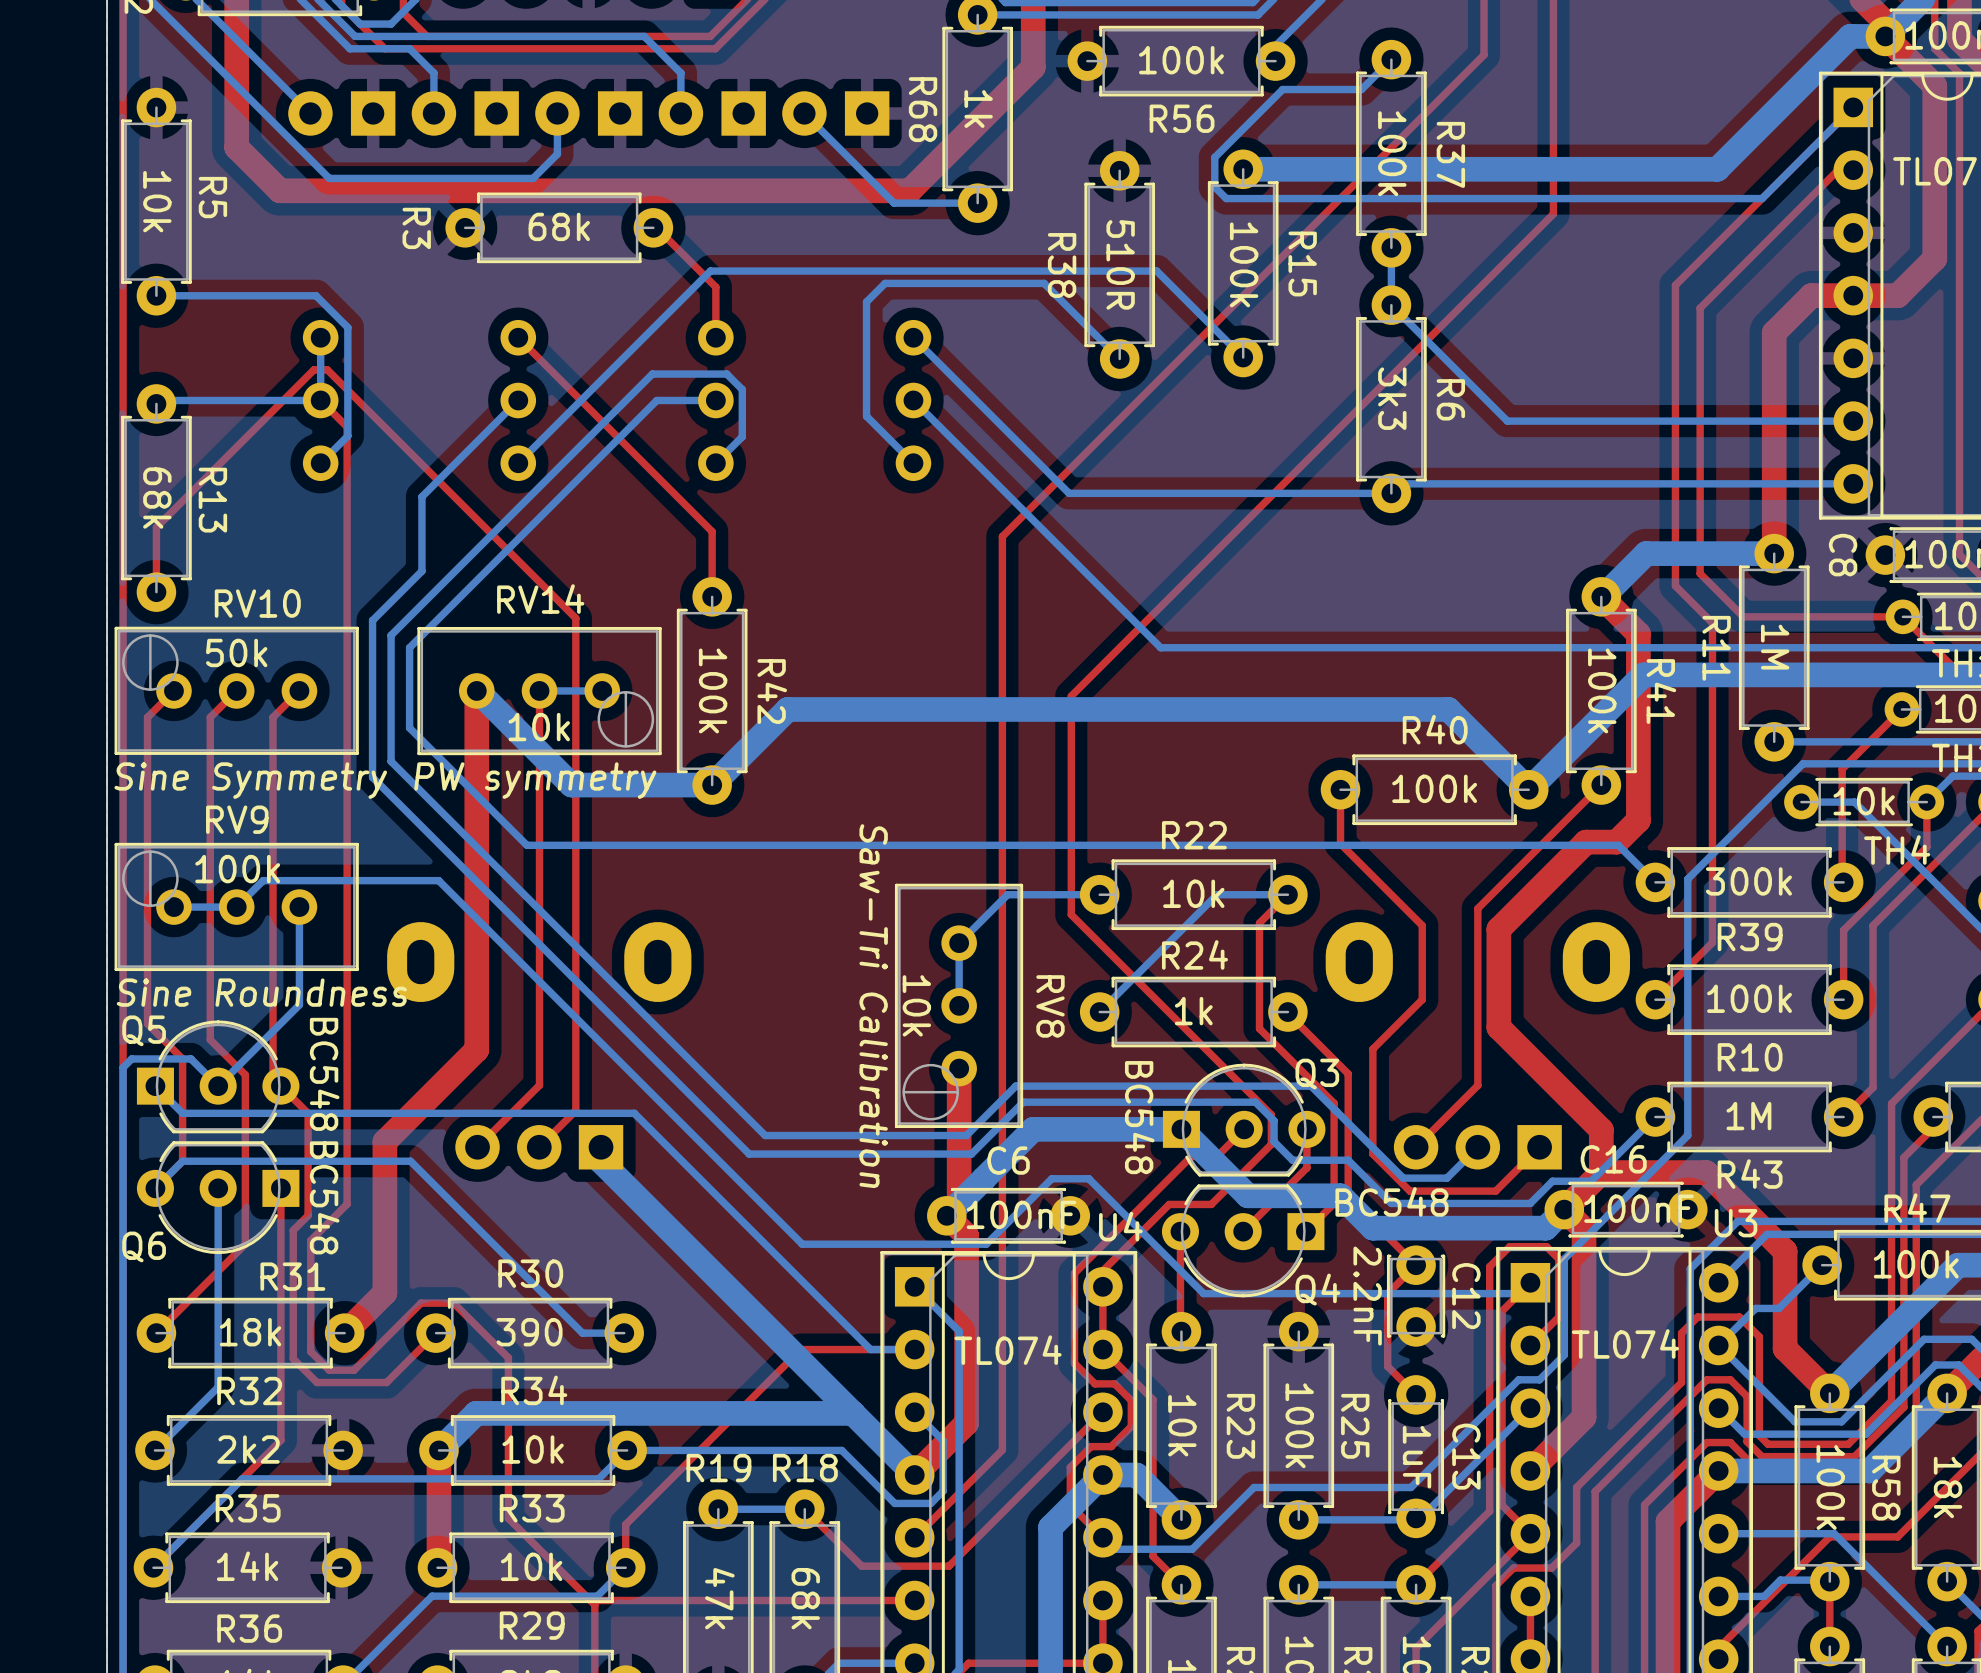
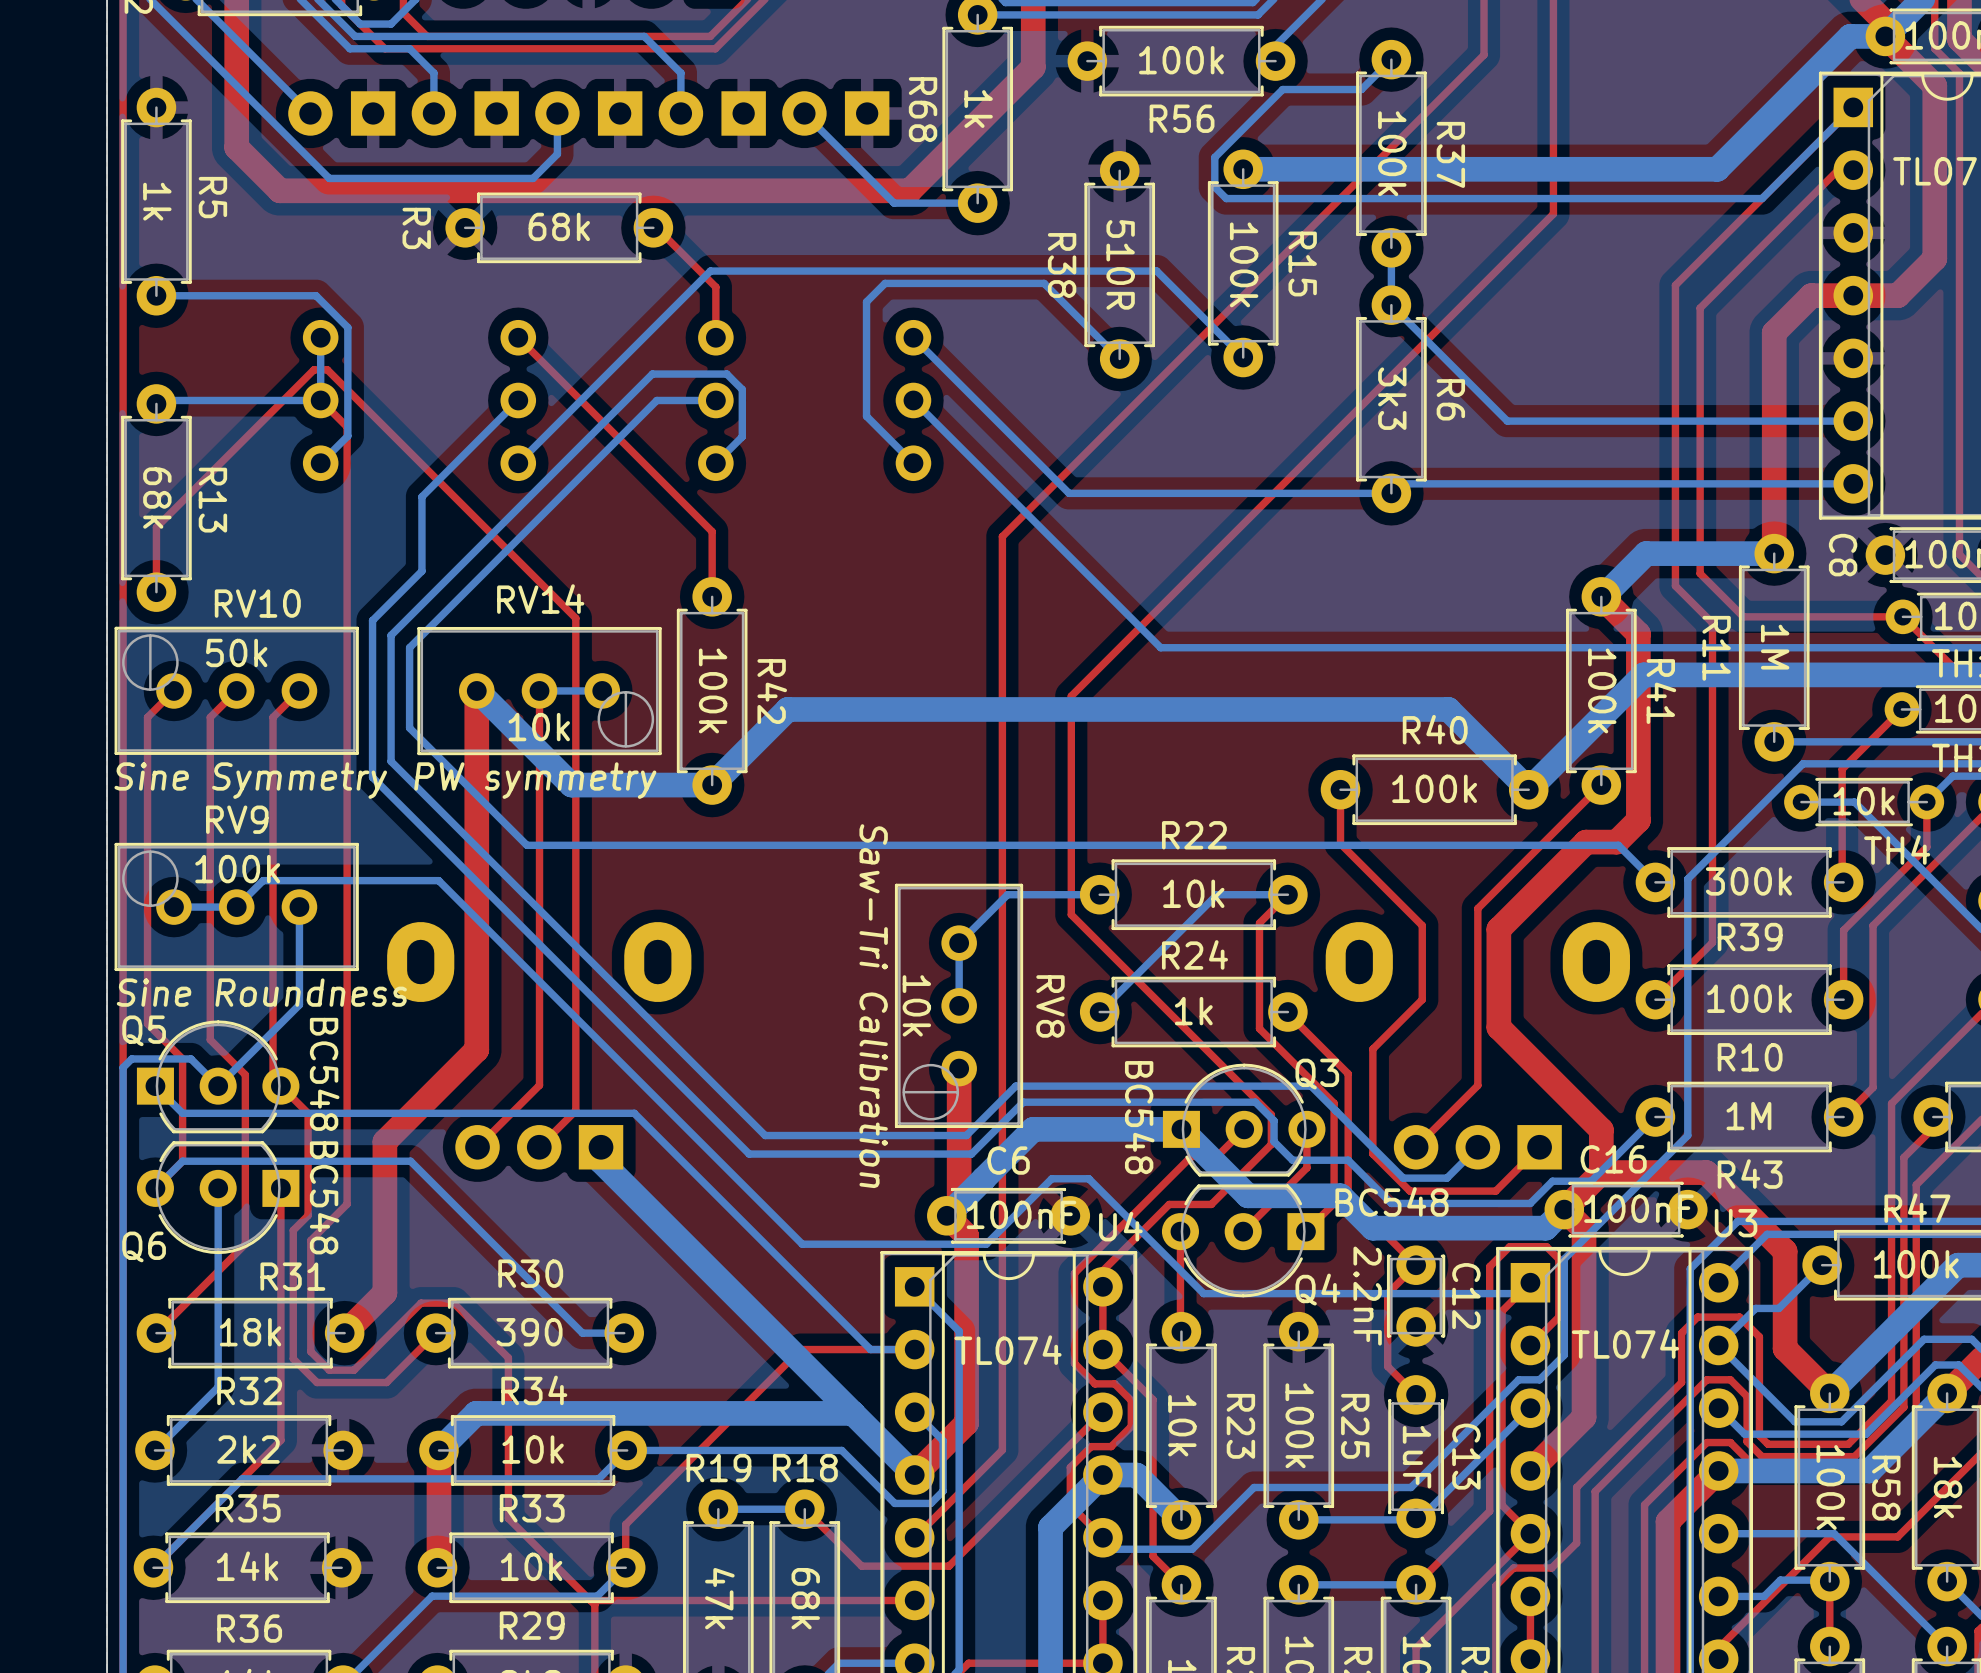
R5 value: 10k (157, 201) -> 1k (157, 201)

